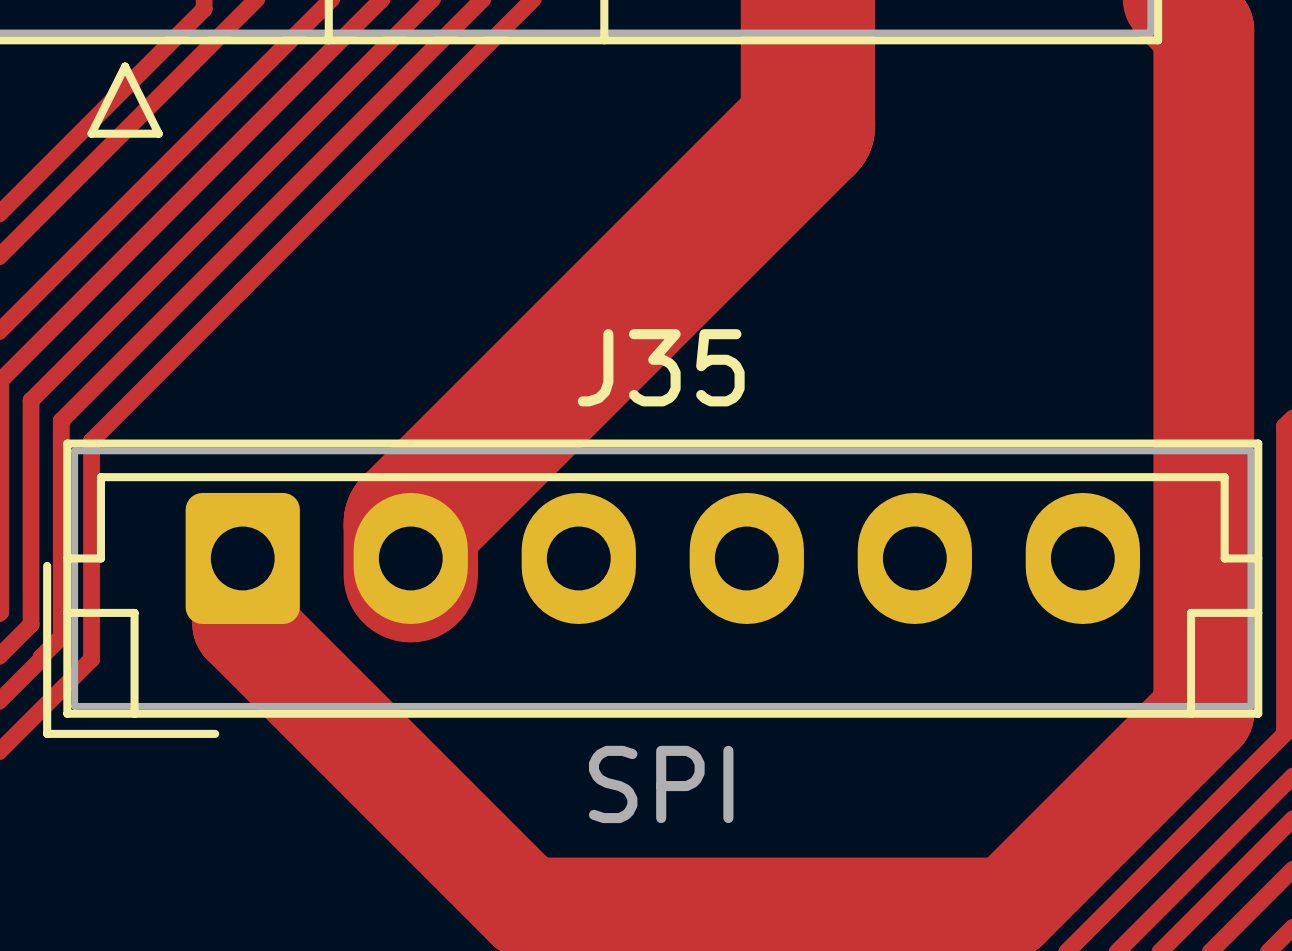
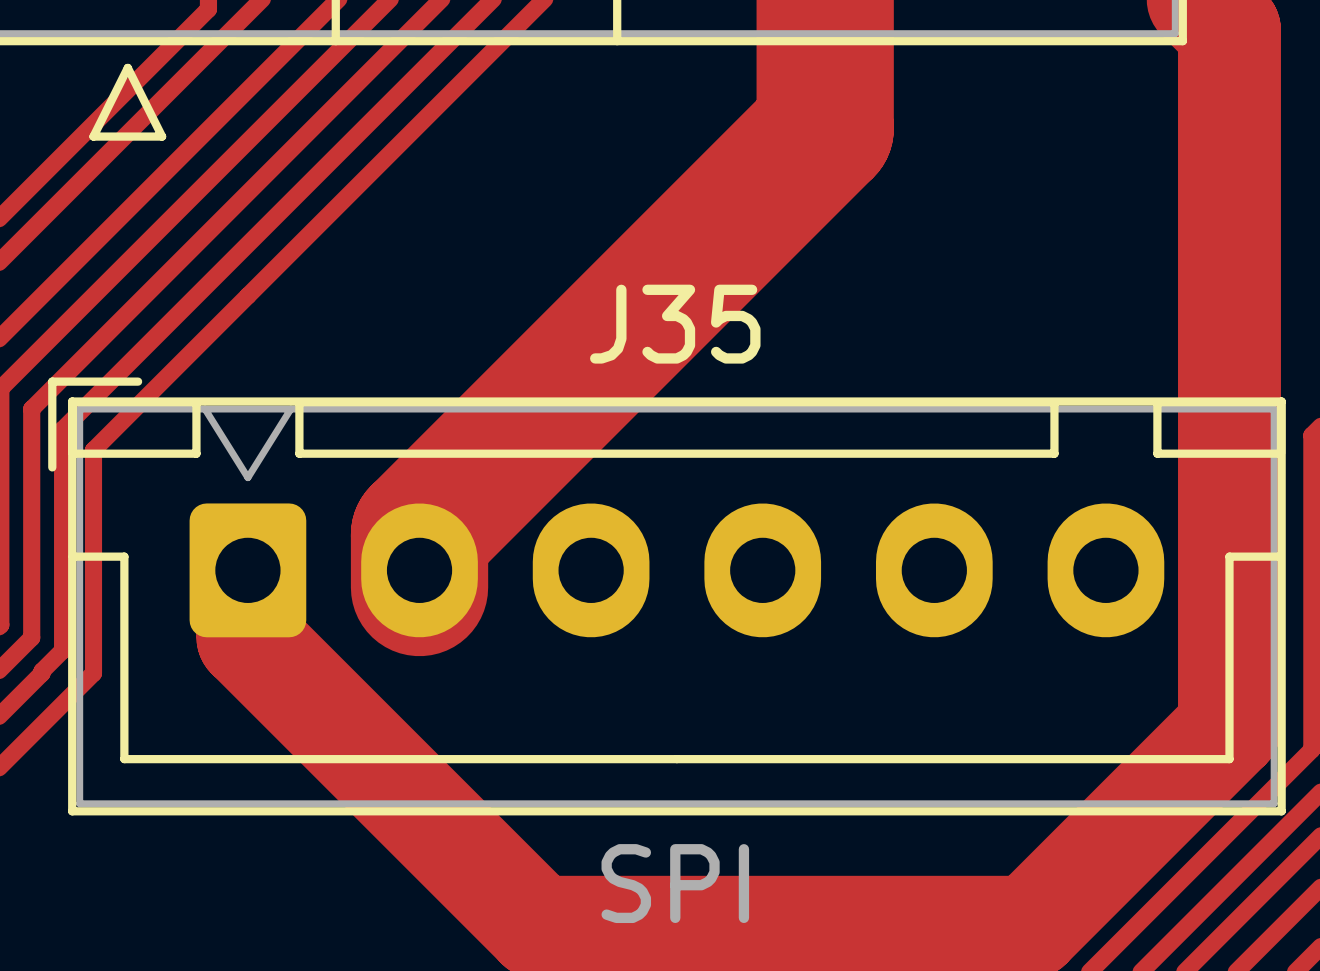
J35 footprint: [43, 439, 1263, 738] -> [48, 377, 1286, 816]

